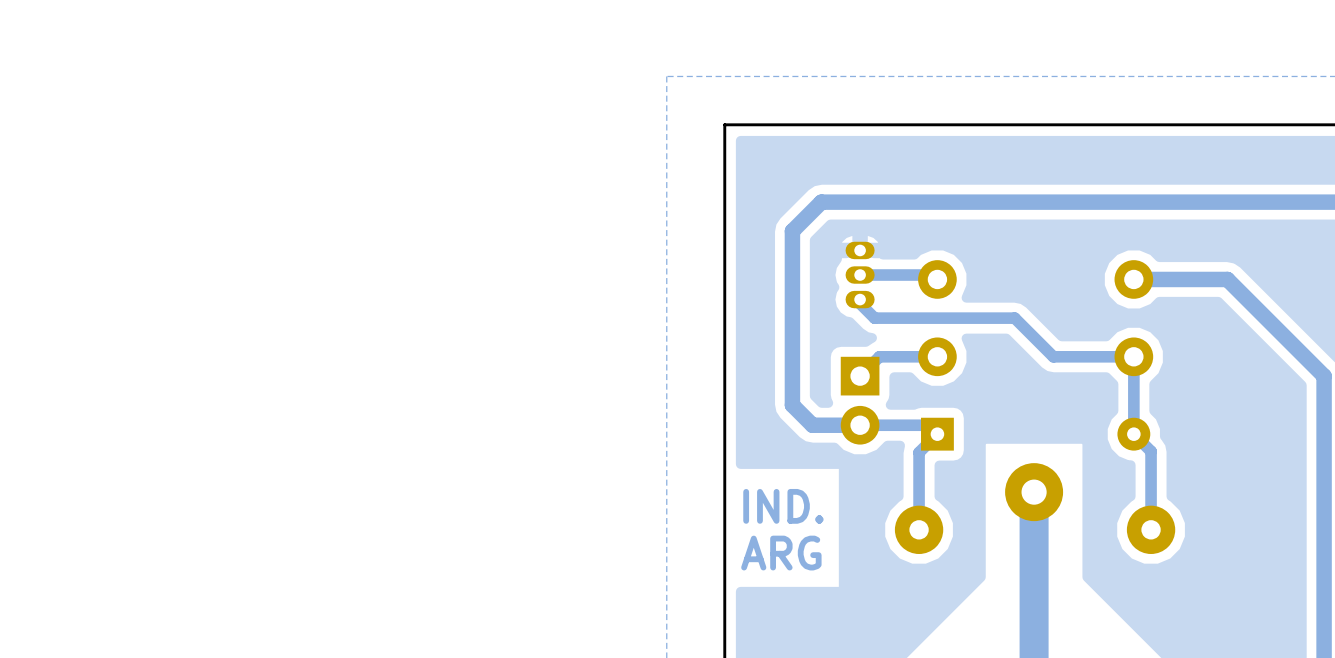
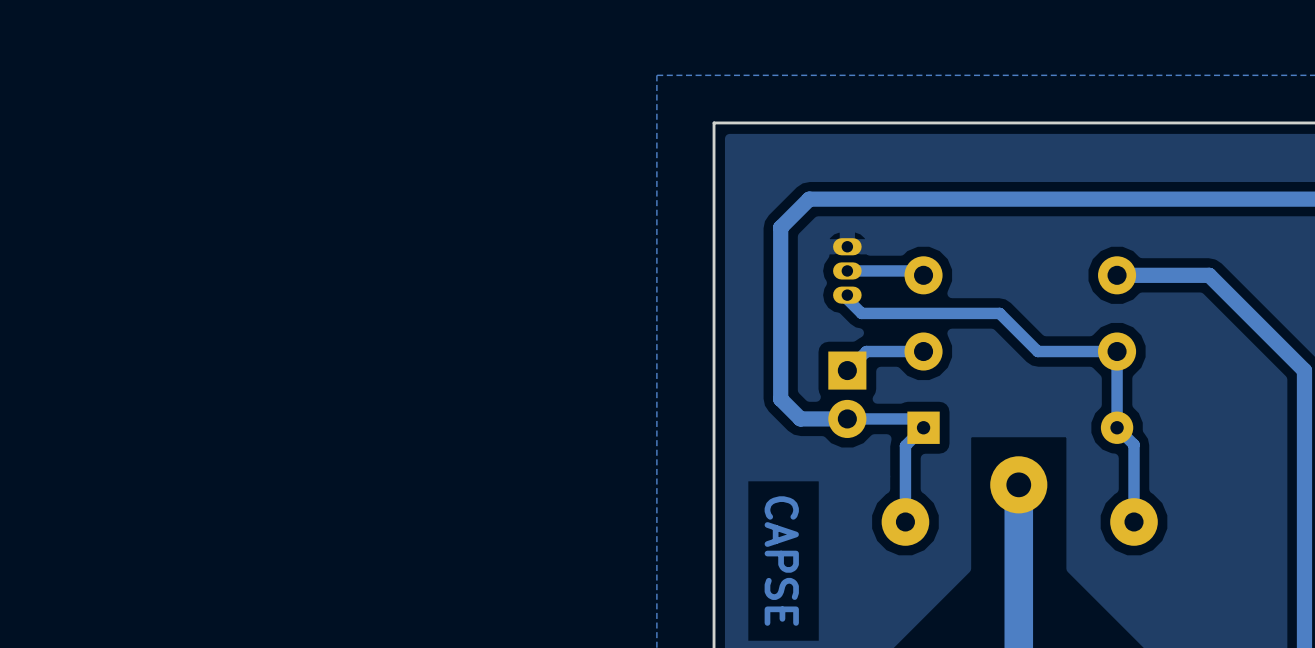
text: IND. (783, 506) -> none
text: ARG (781, 553) -> CAPSE (781, 561)

